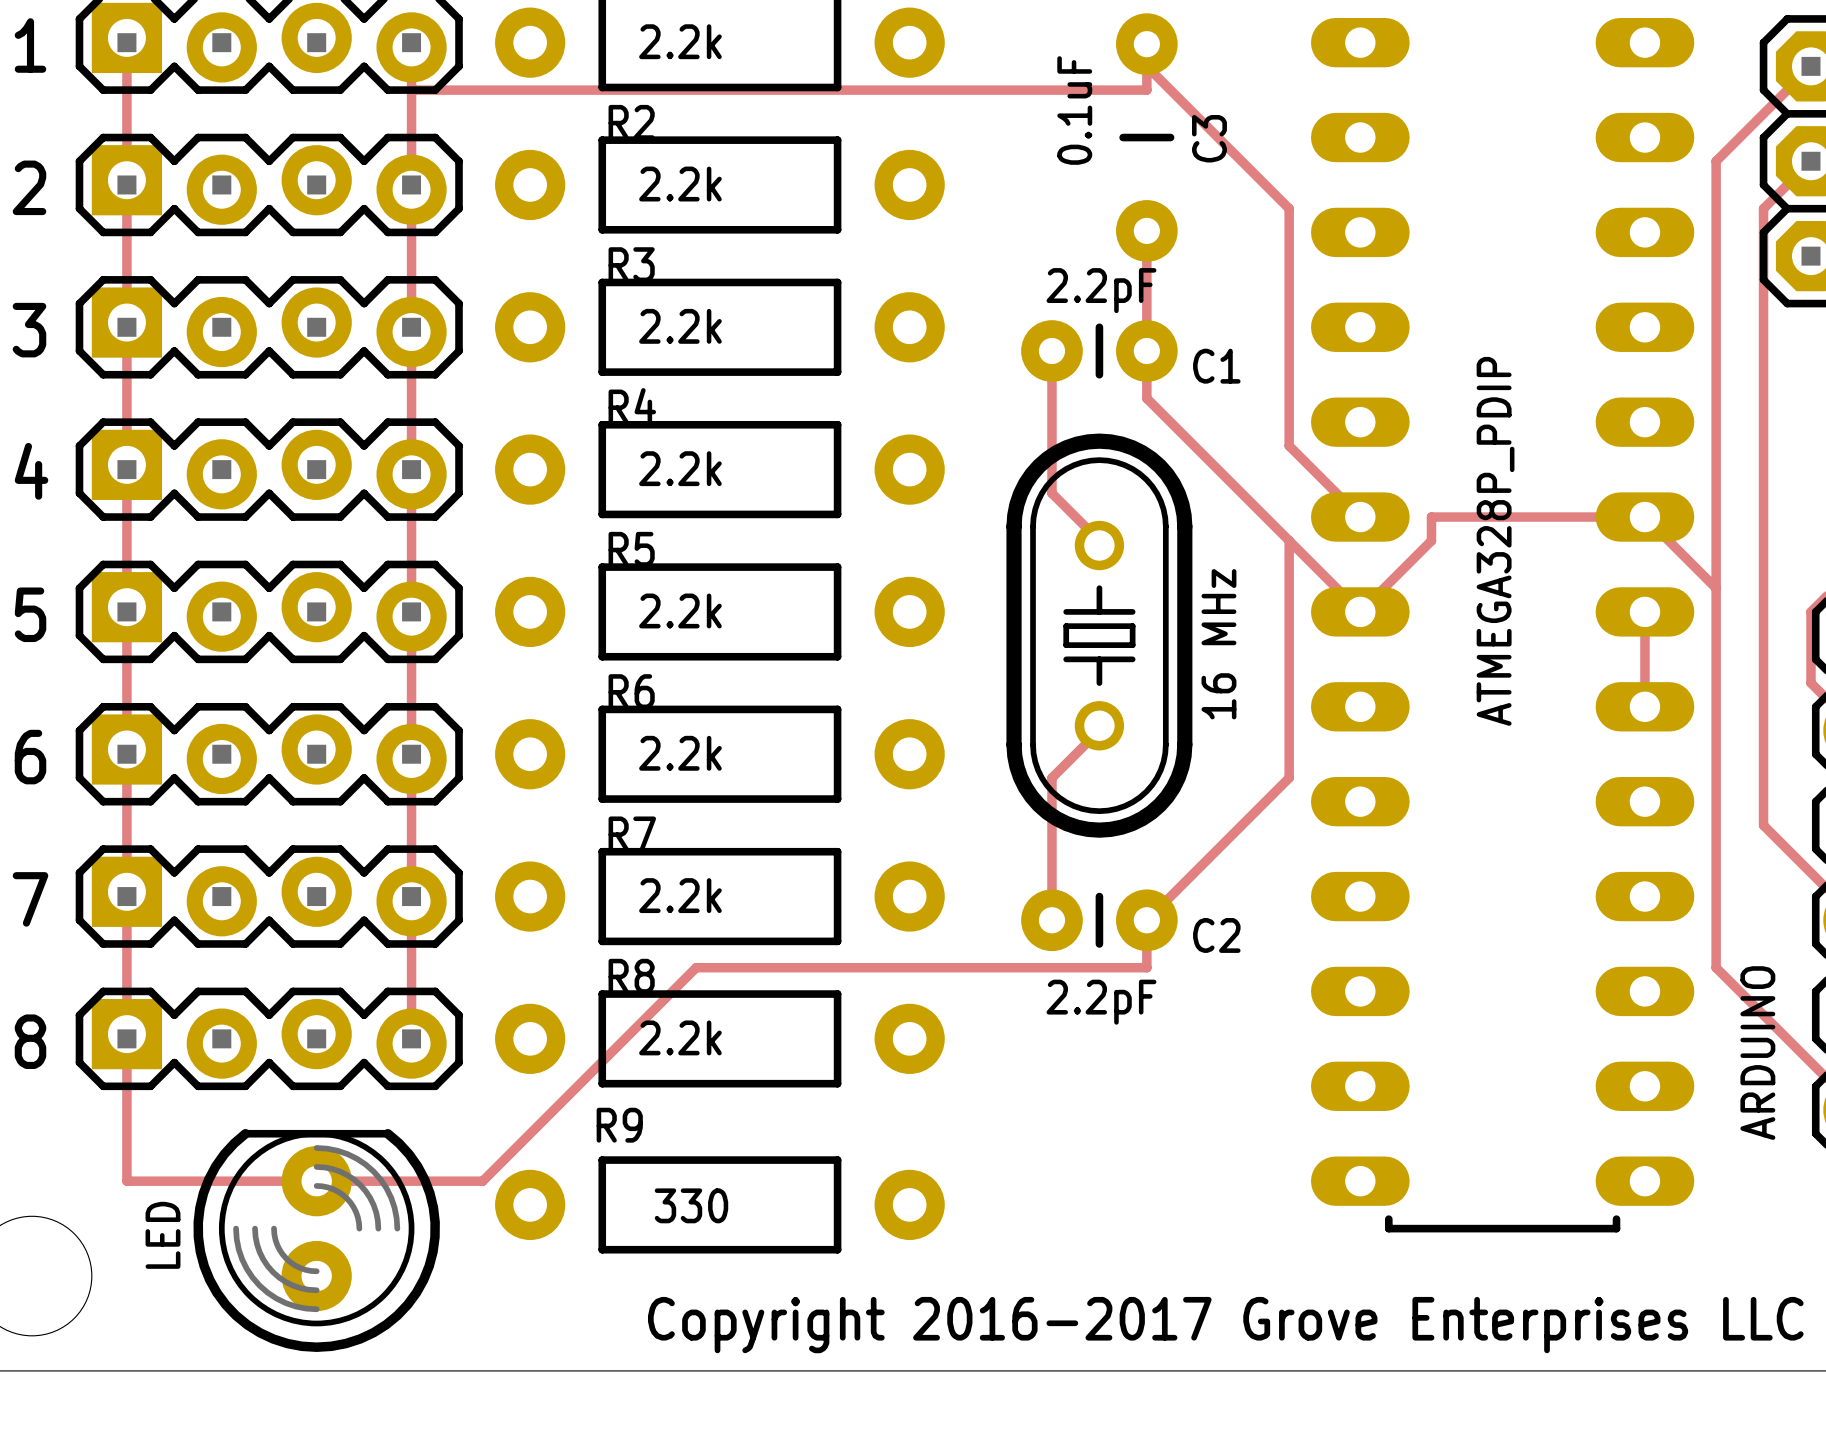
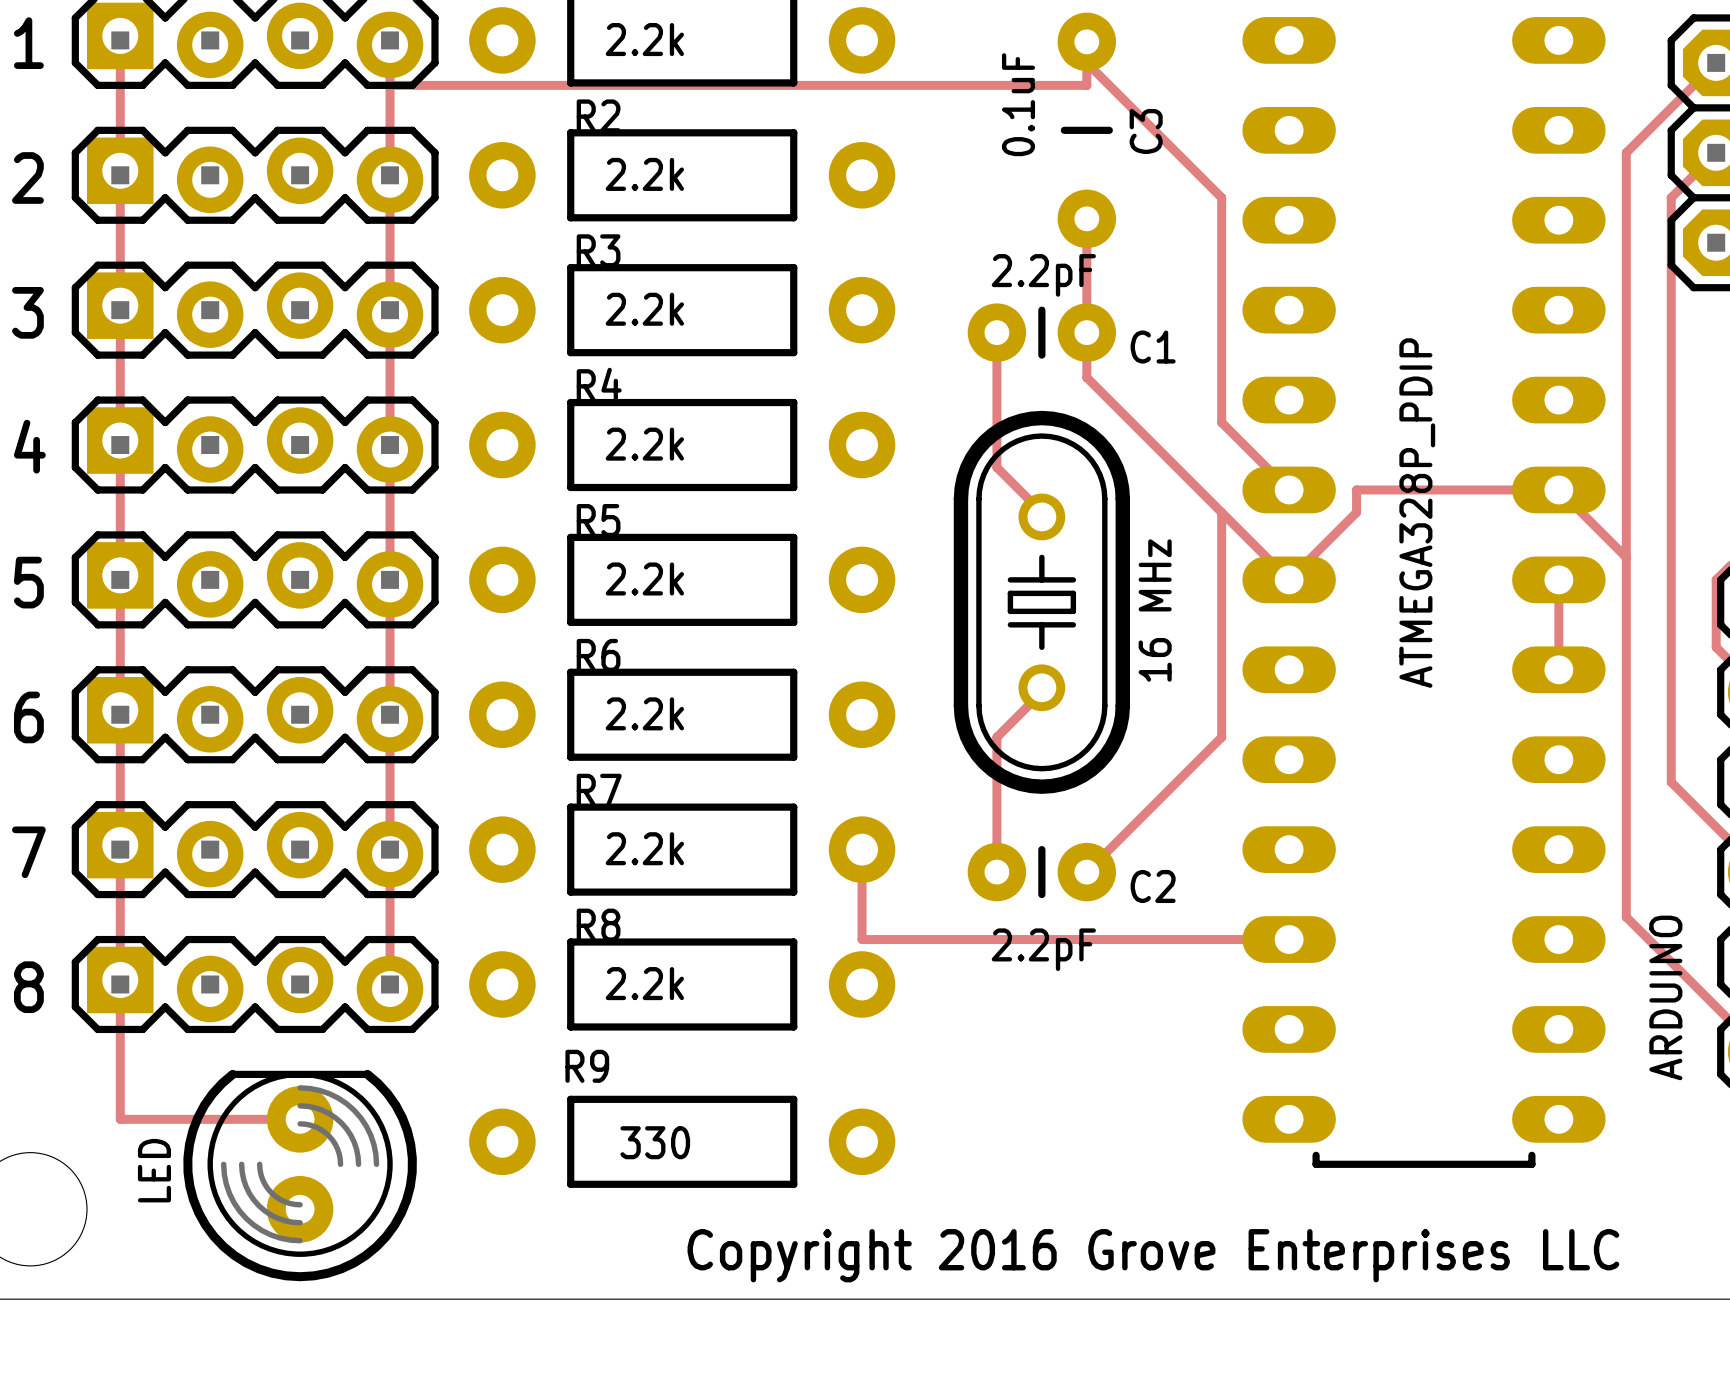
track: none -> (862, 849) (862, 939) (1289, 939)
track: (1146, 920) (1146, 967) (696, 967) (482, 1181) (316, 1181) -> none
text: Copyright 2016-2017 Grove Enterprises LLC (1225, 1325) -> Copyright 2016 Grove Enterprises LLC (1153, 1255)

